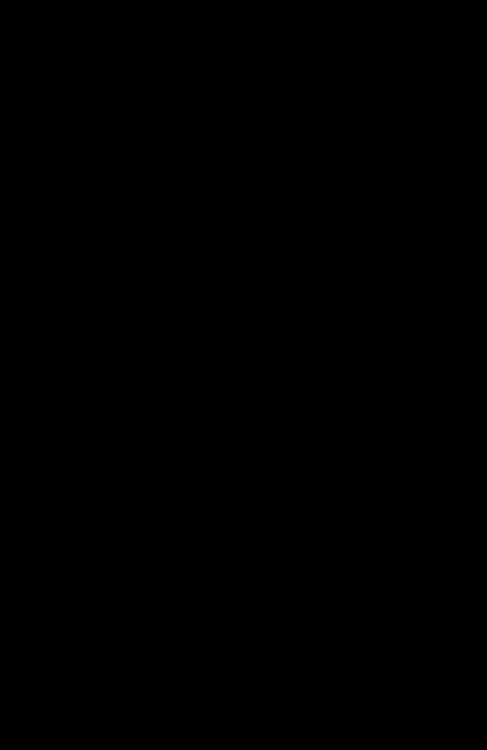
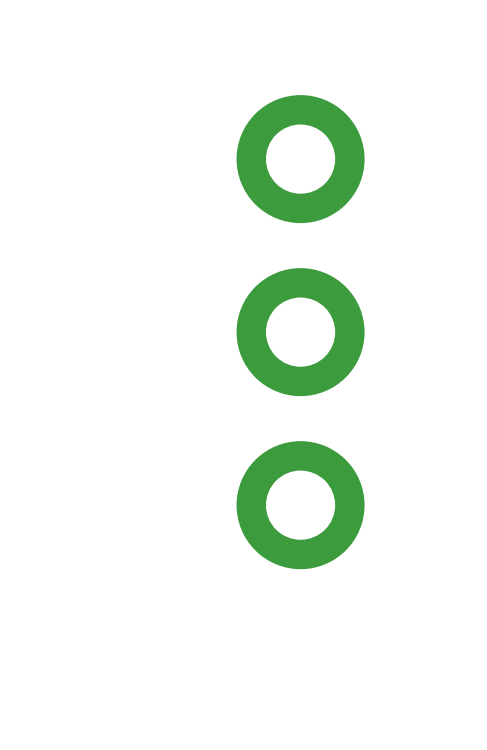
part: none -> (300, 332)

